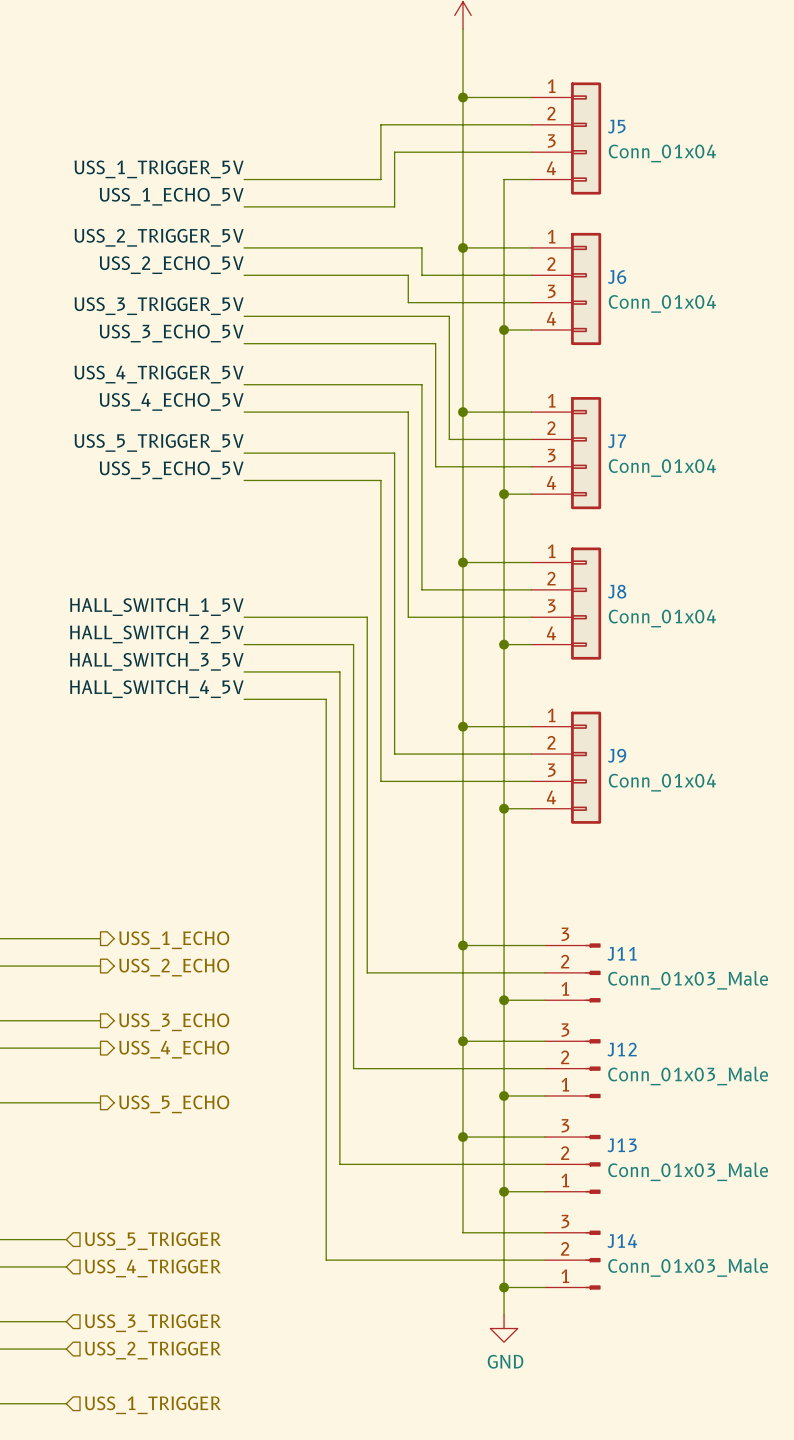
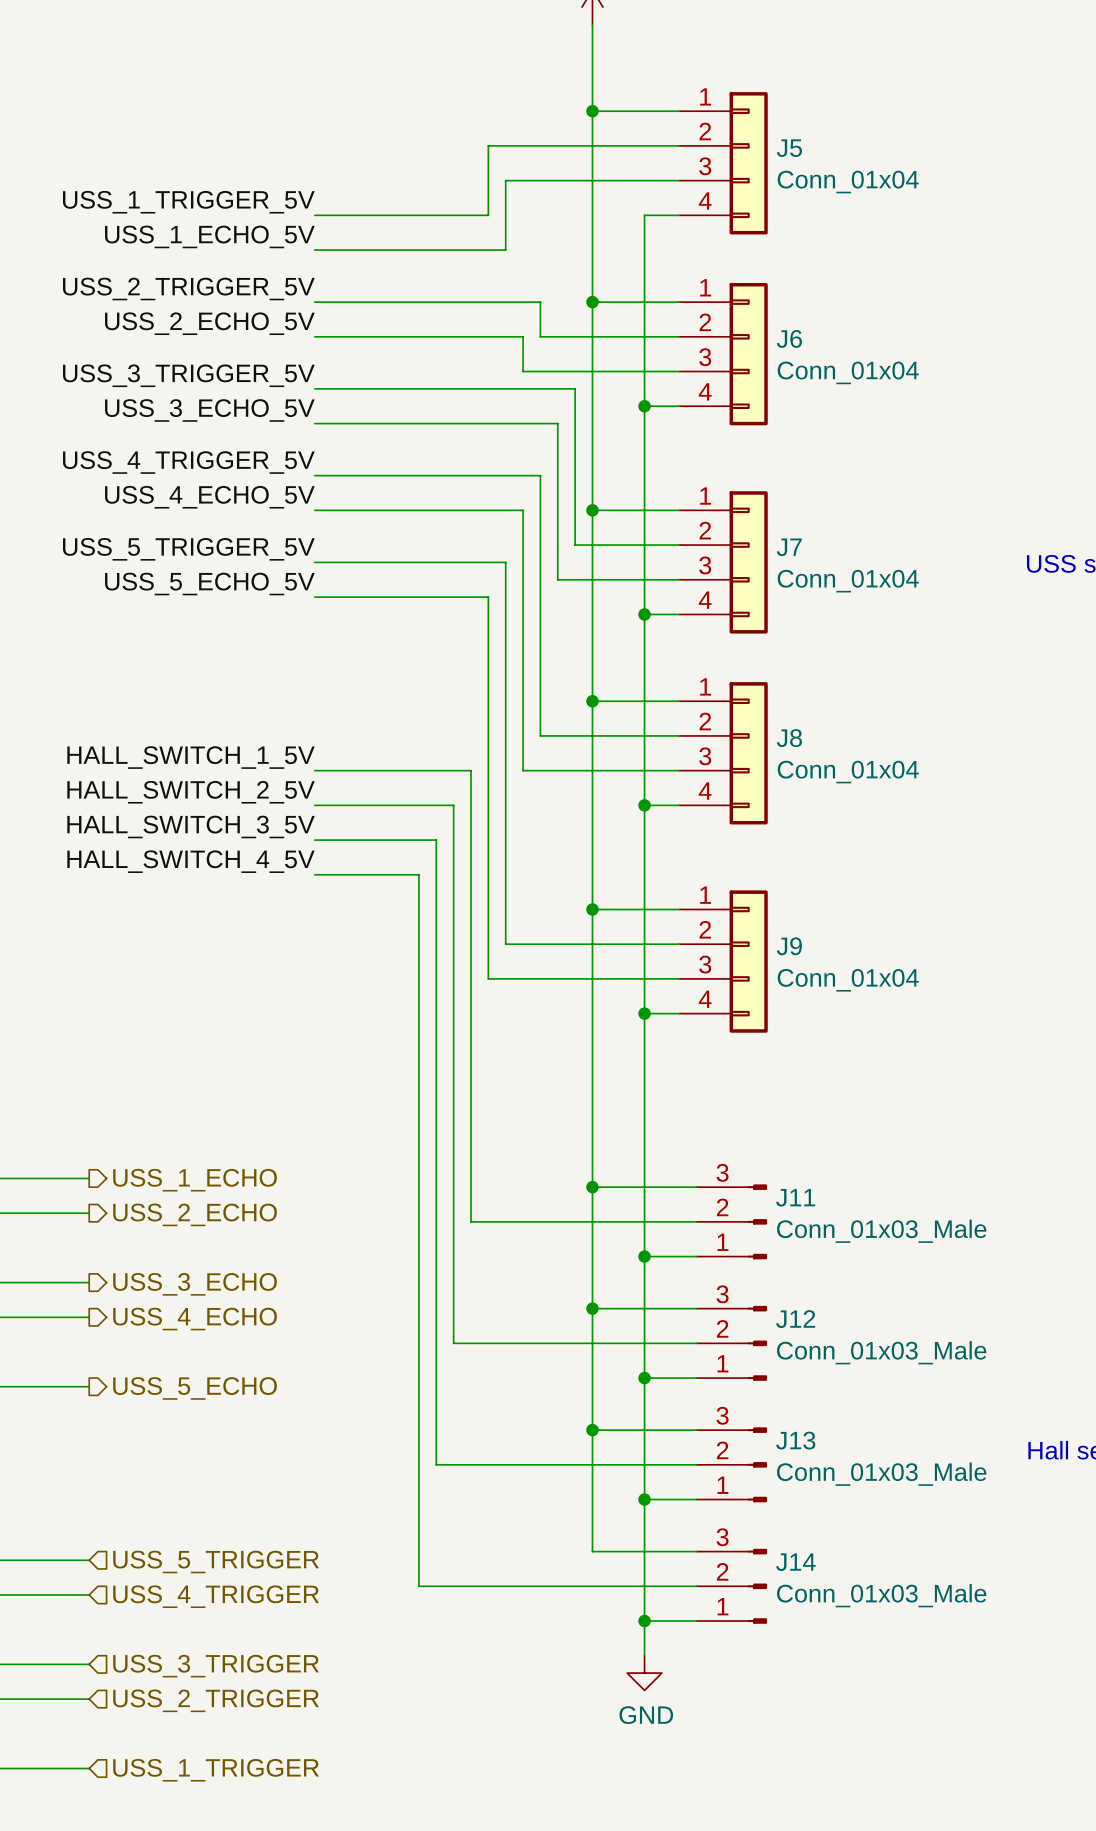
wire: (66, 938) (100, 938) -> none
hierarchical label position: USS_1_ECHO (174, 940) -> USS_1_ECHO (195, 1180)
wire: (66, 966) (100, 966) -> none
hierarchical label position: USS_2_ECHO (174, 967) -> USS_2_ECHO (195, 1214)
wire: (66, 1020) (100, 1020) -> none
hierarchical label position: USS_3_ECHO (174, 1022) -> USS_3_ECHO (195, 1284)
wire: (66, 1048) (100, 1048) -> none
hierarchical label position: USS_4_ECHO (174, 1049) -> USS_4_ECHO (195, 1319)
wire: (66, 1102) (100, 1102) -> none
hierarchical label position: USS_5_ECHO (174, 1104) -> USS_5_ECHO (195, 1388)

